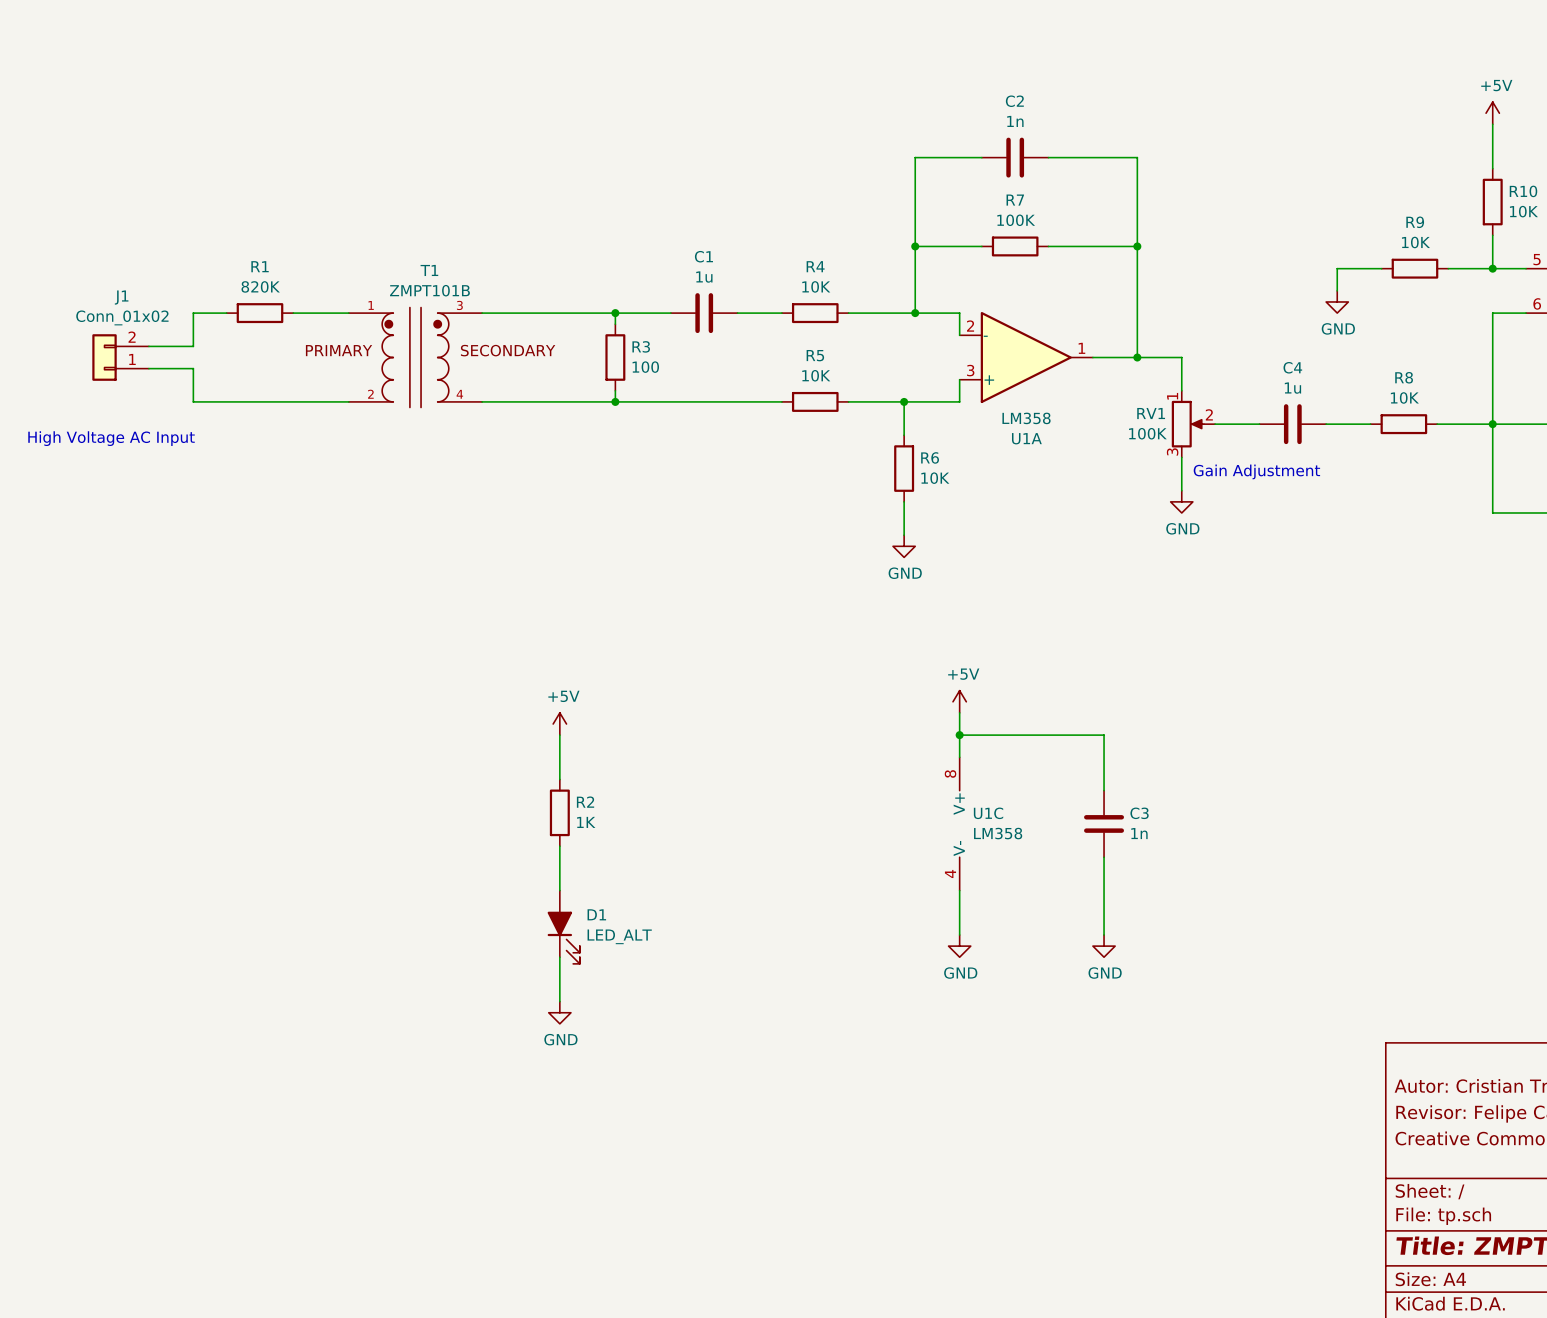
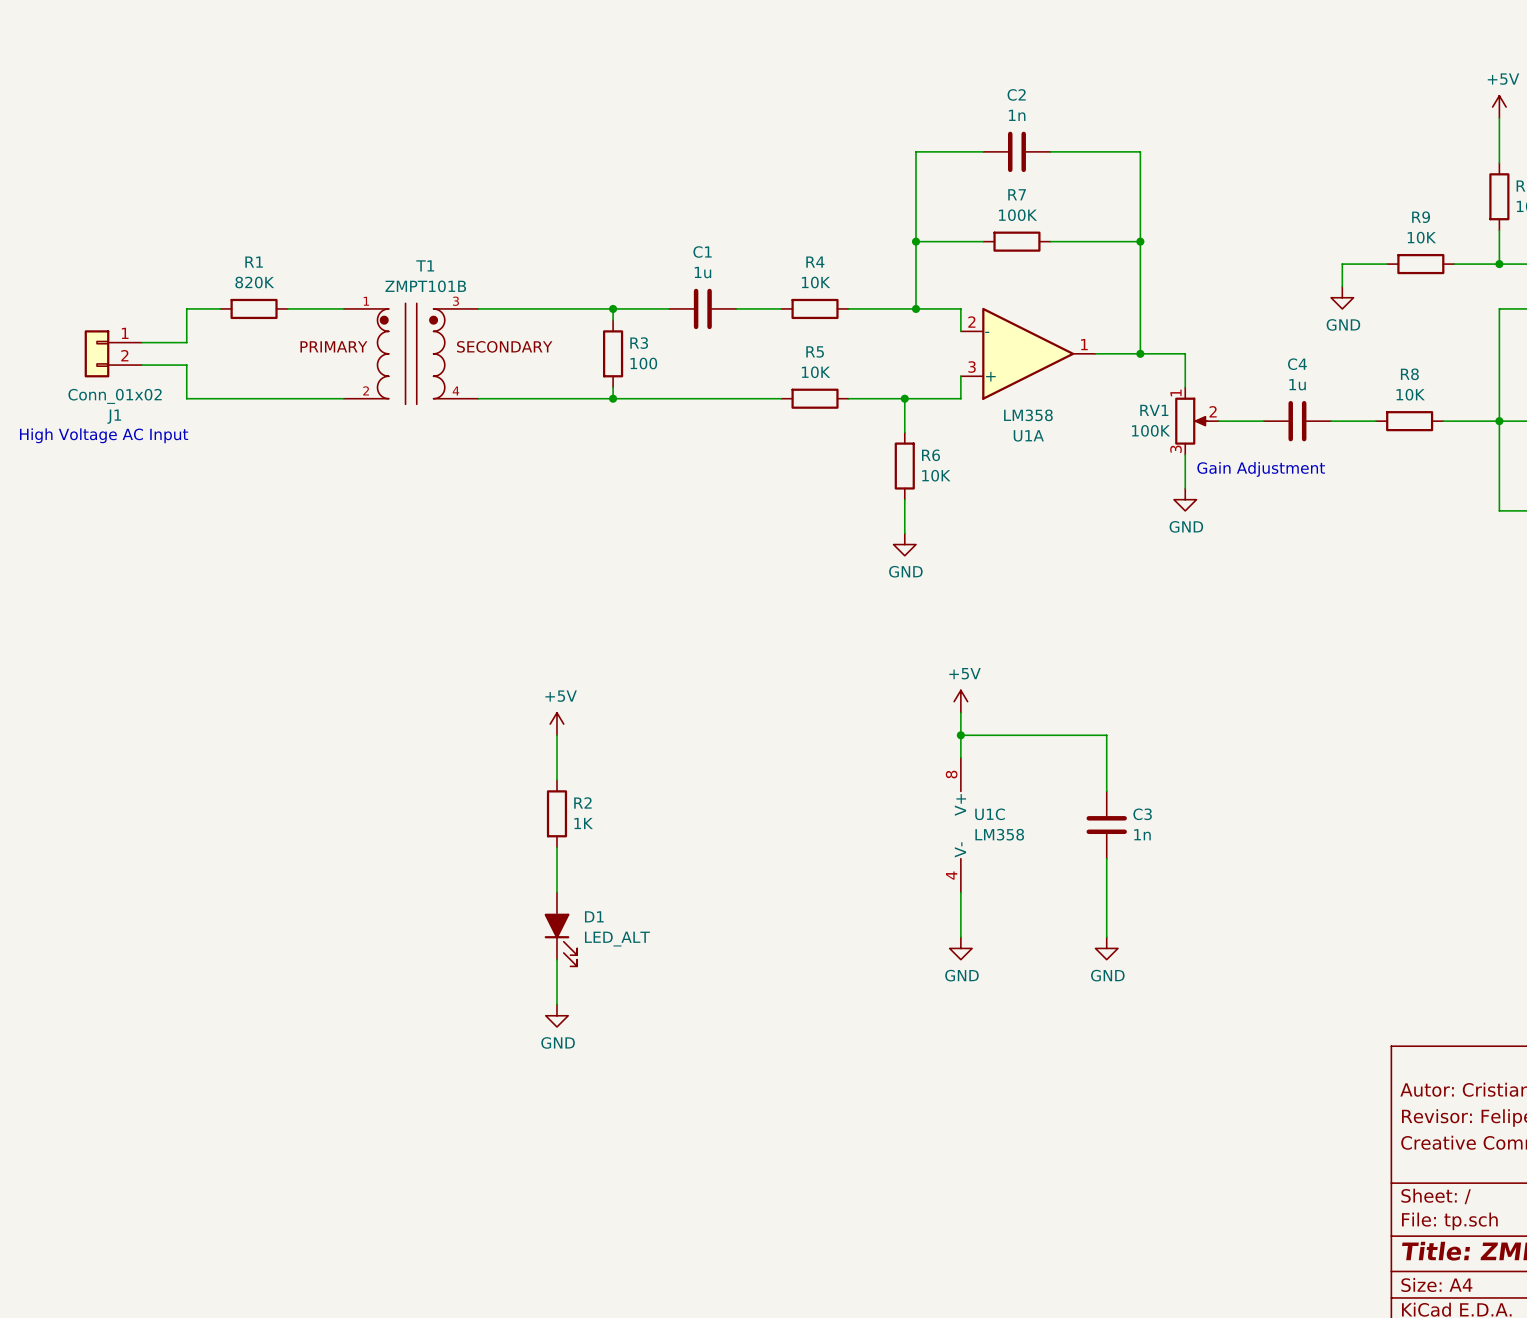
J1 flip: as is (104, 357) -> up-down (97, 353)

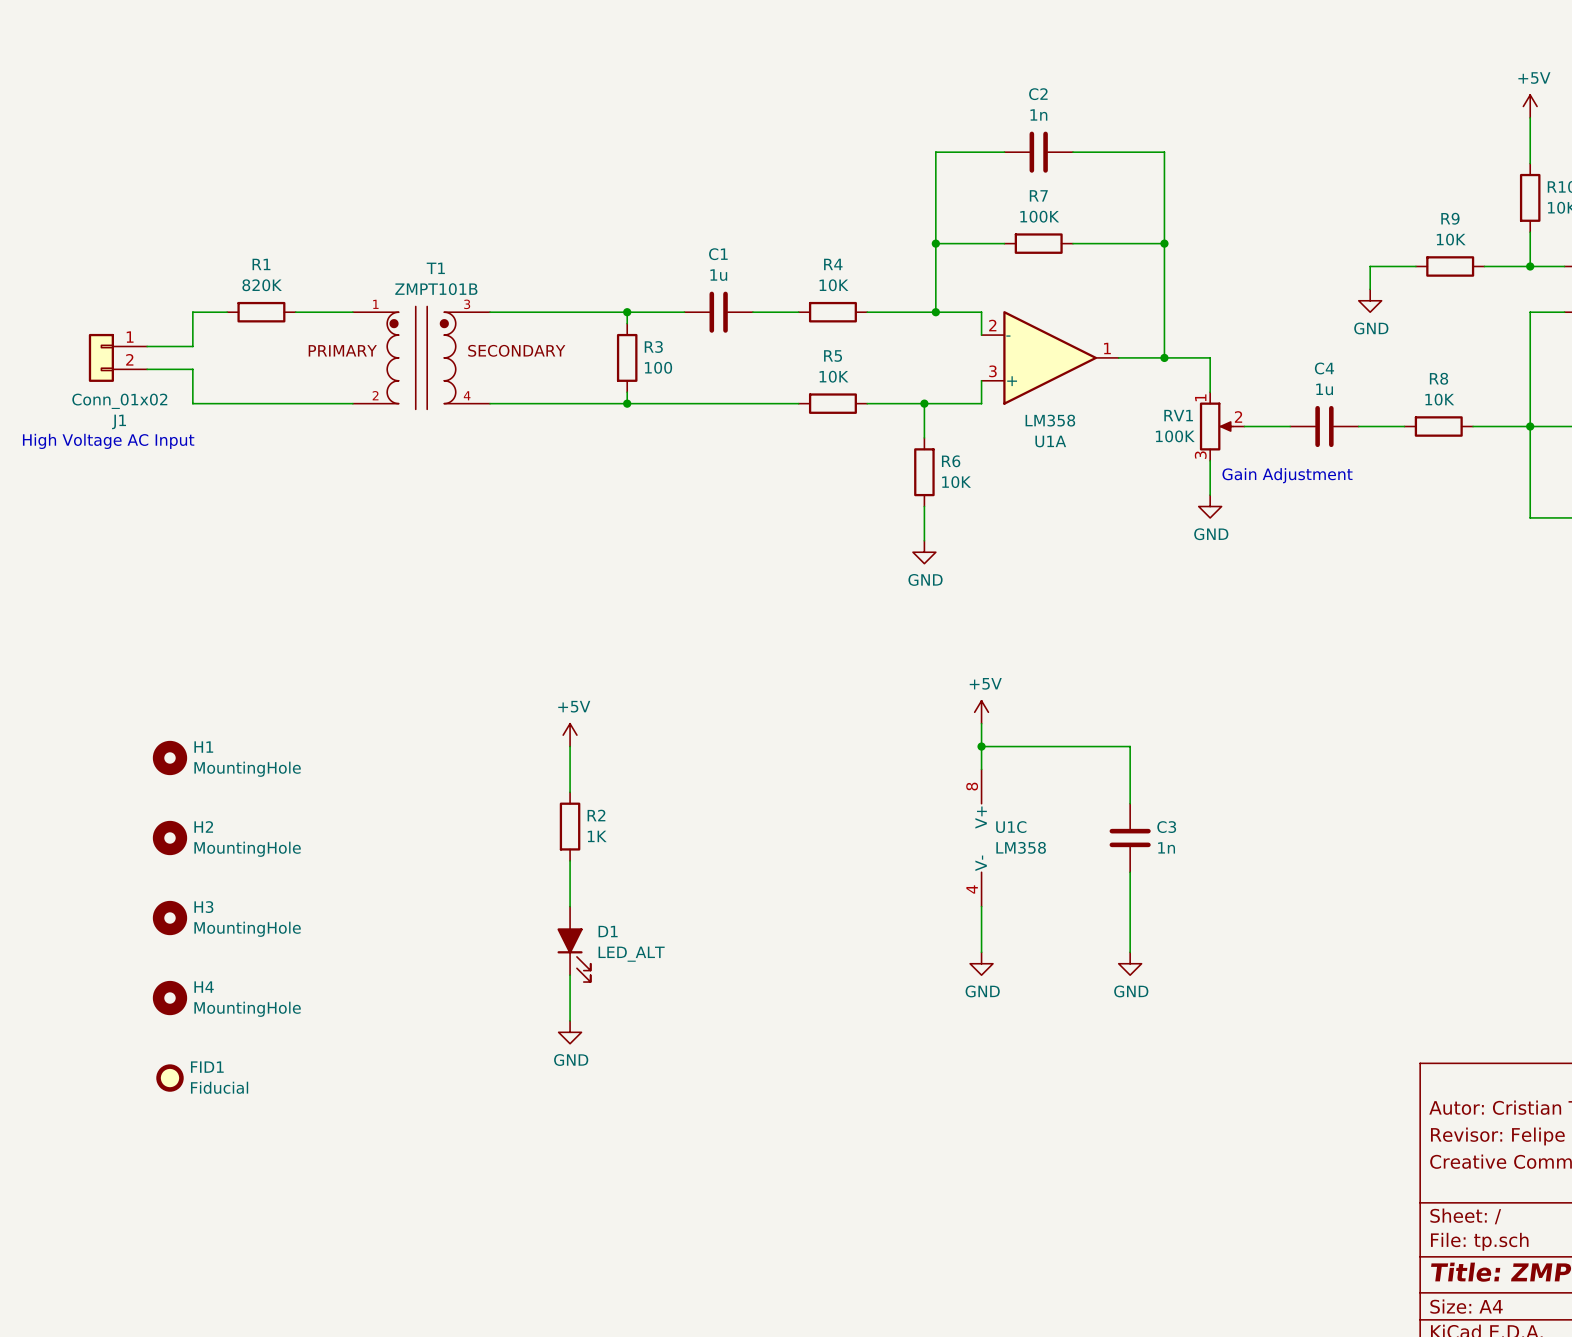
H1: none -> MountingHole (169, 757)
H2: none -> MountingHole (169, 838)
H3: none -> MountingHole (169, 918)
H4: none -> MountingHole (169, 998)
FID1: none -> Fiducial (169, 1078)

